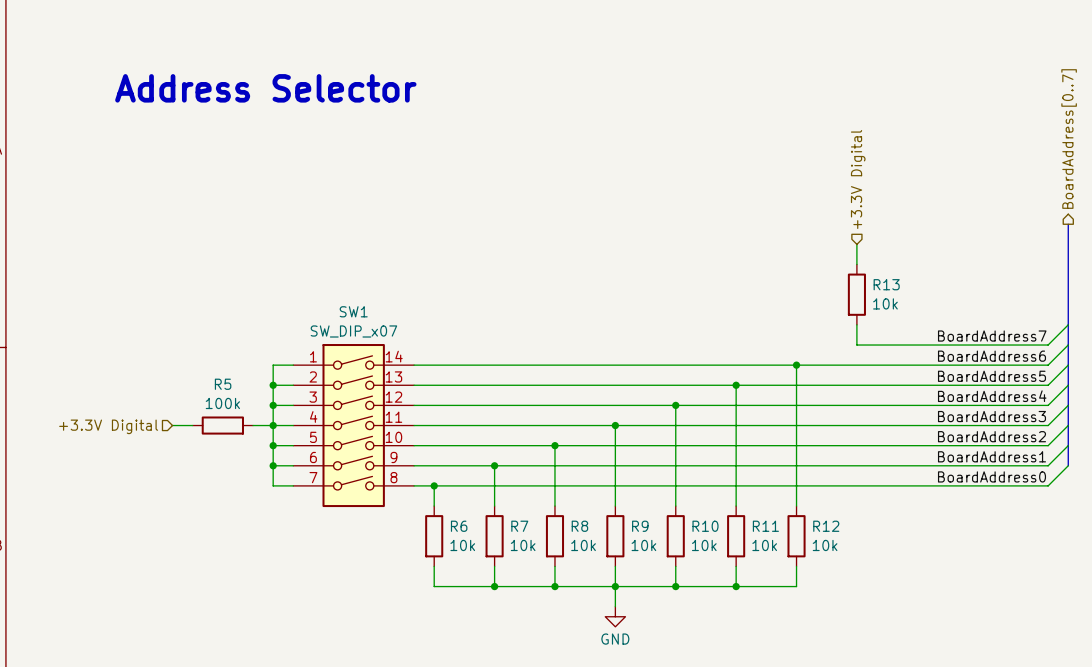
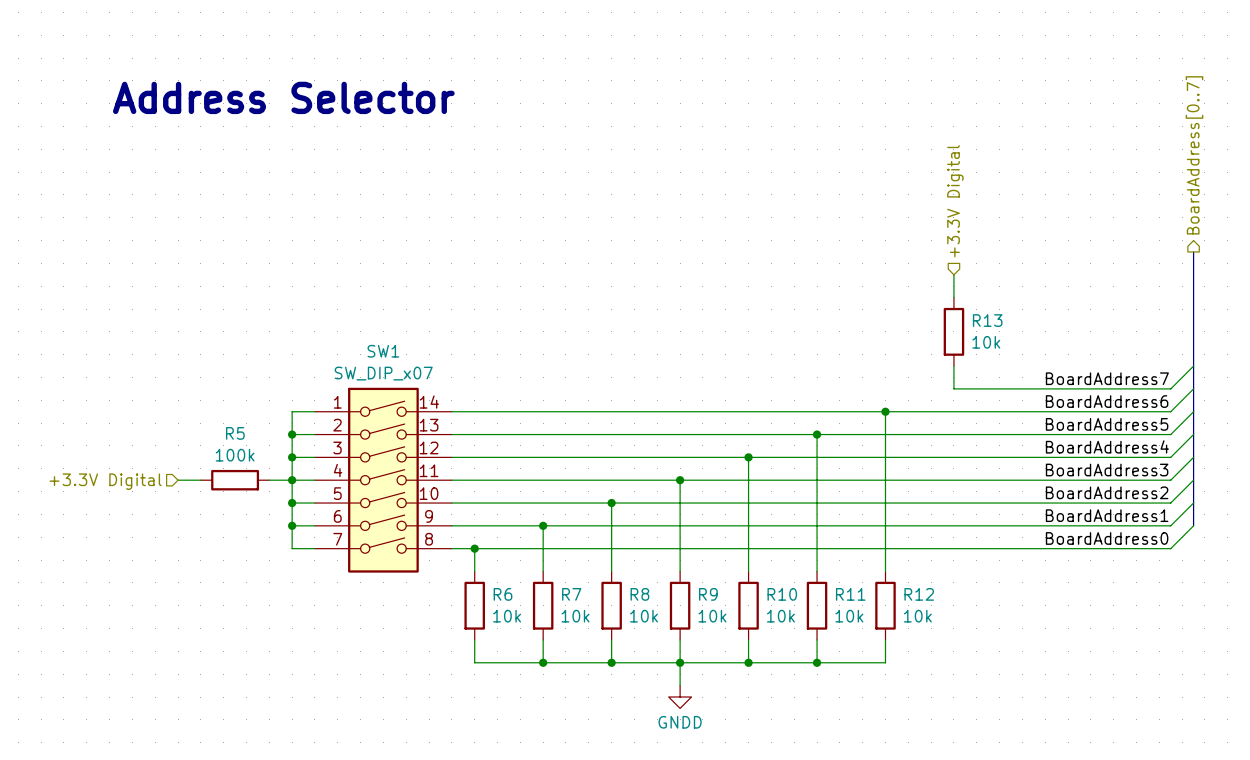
power symbol: GND (615, 616) -> GNDD (680, 697)

